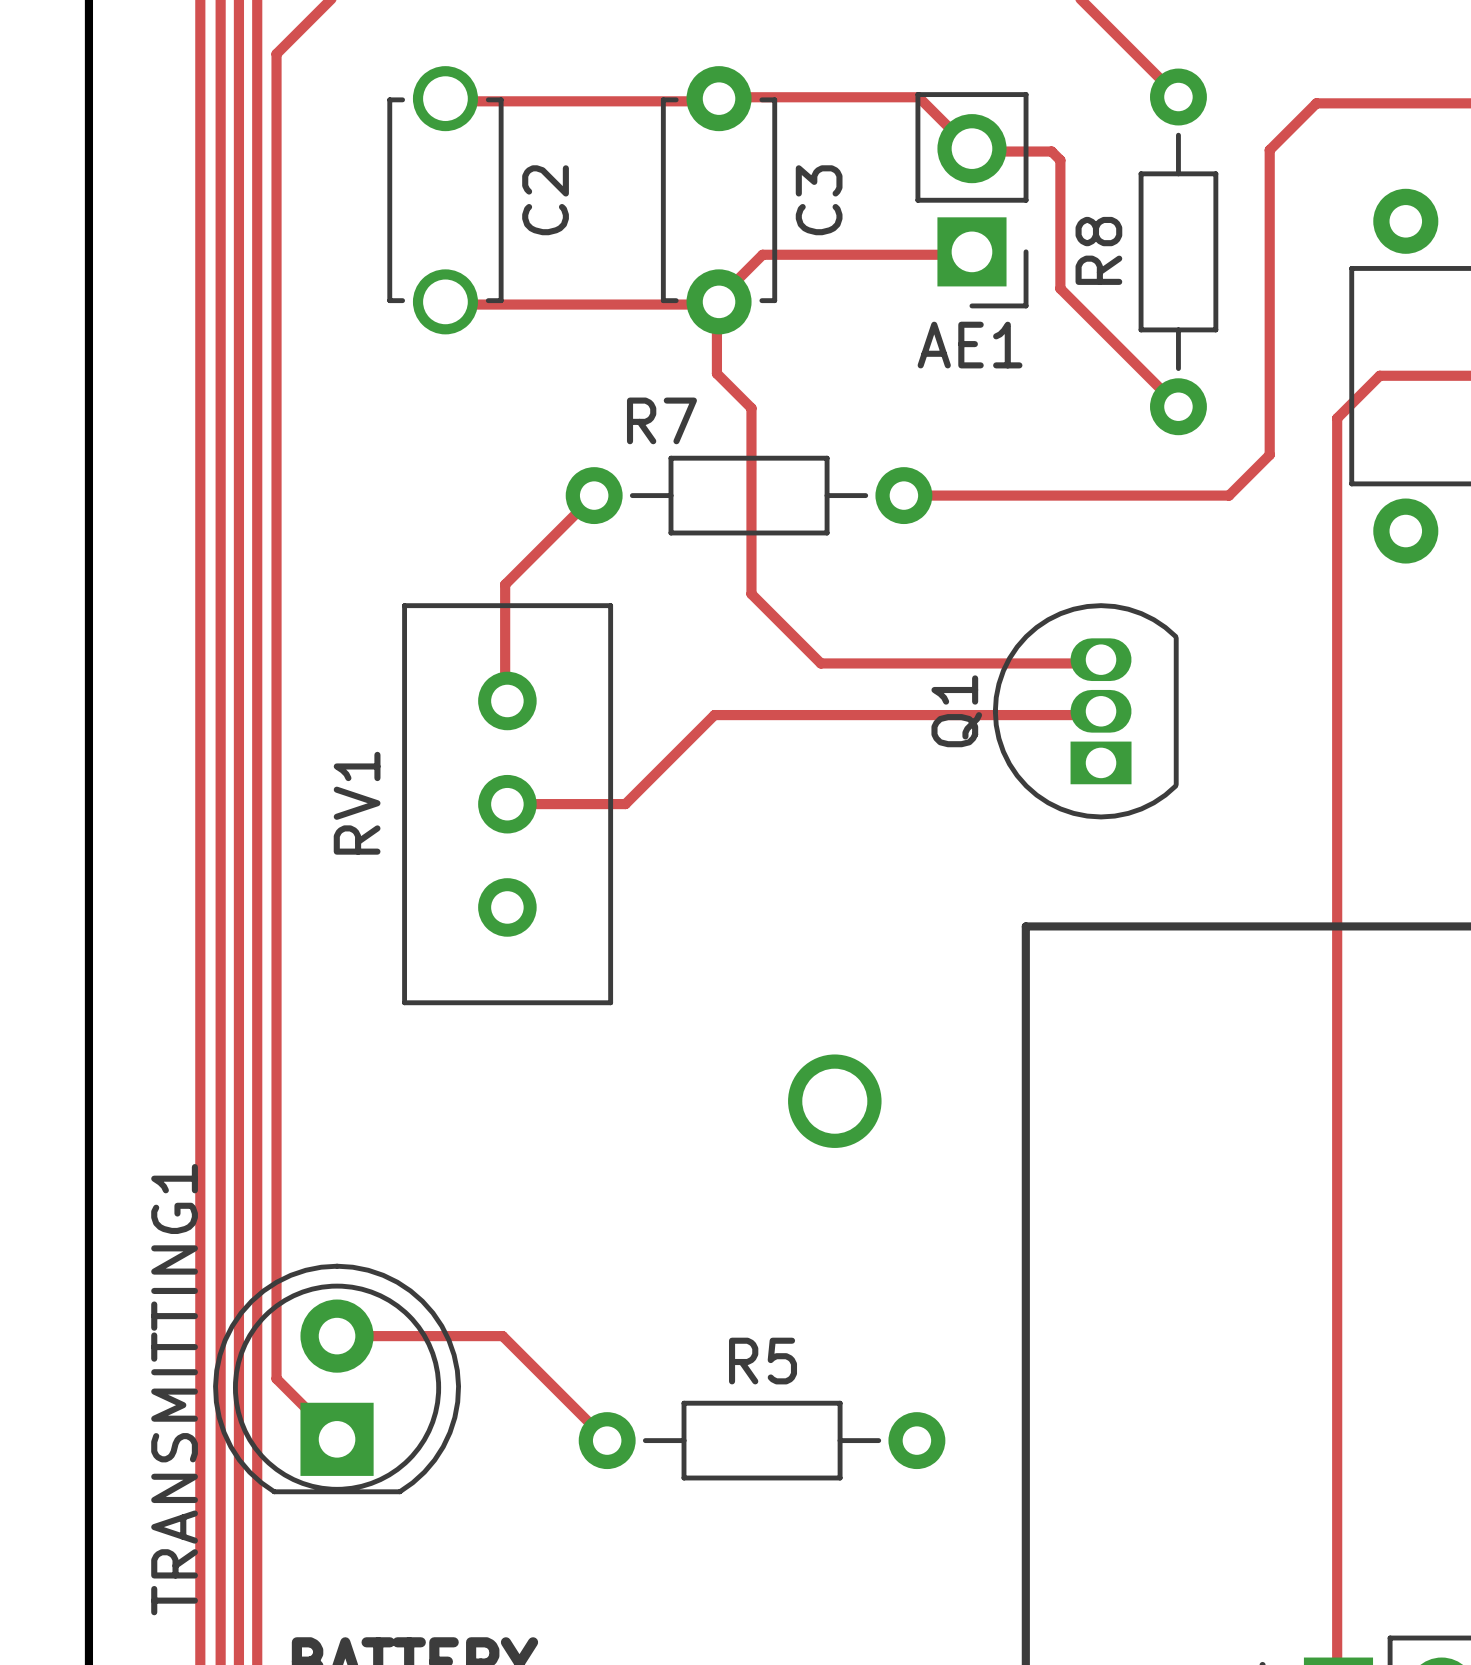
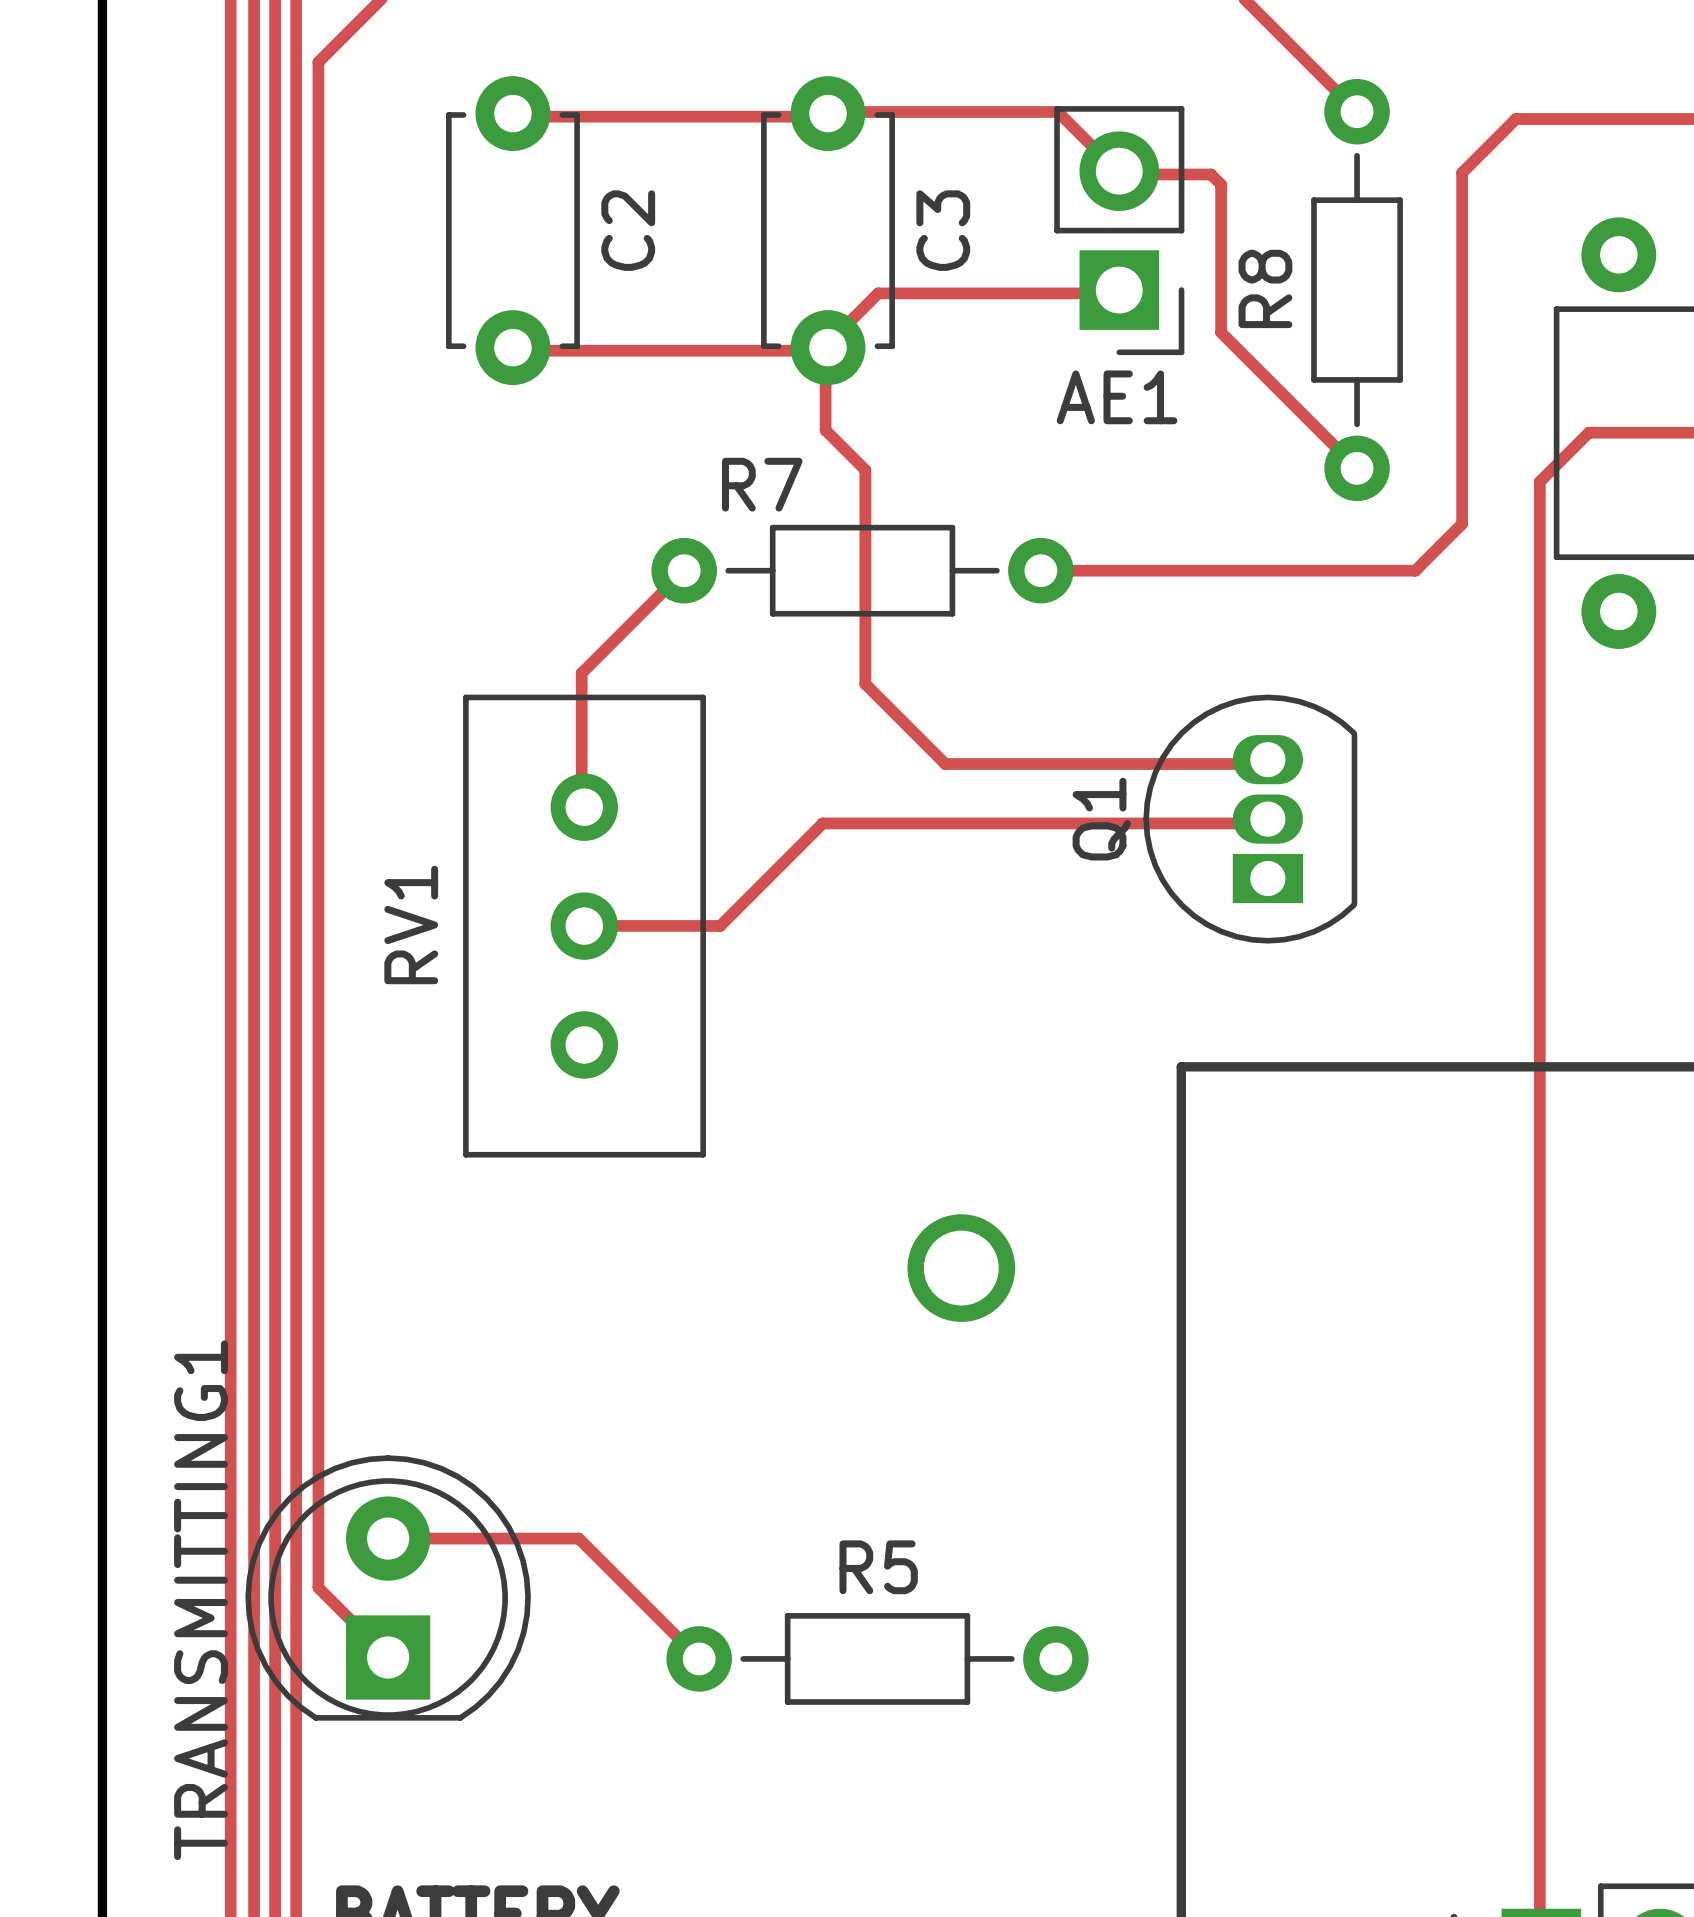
C2 footprint: [387, 66, 504, 335] -> [446, 76, 580, 386]

